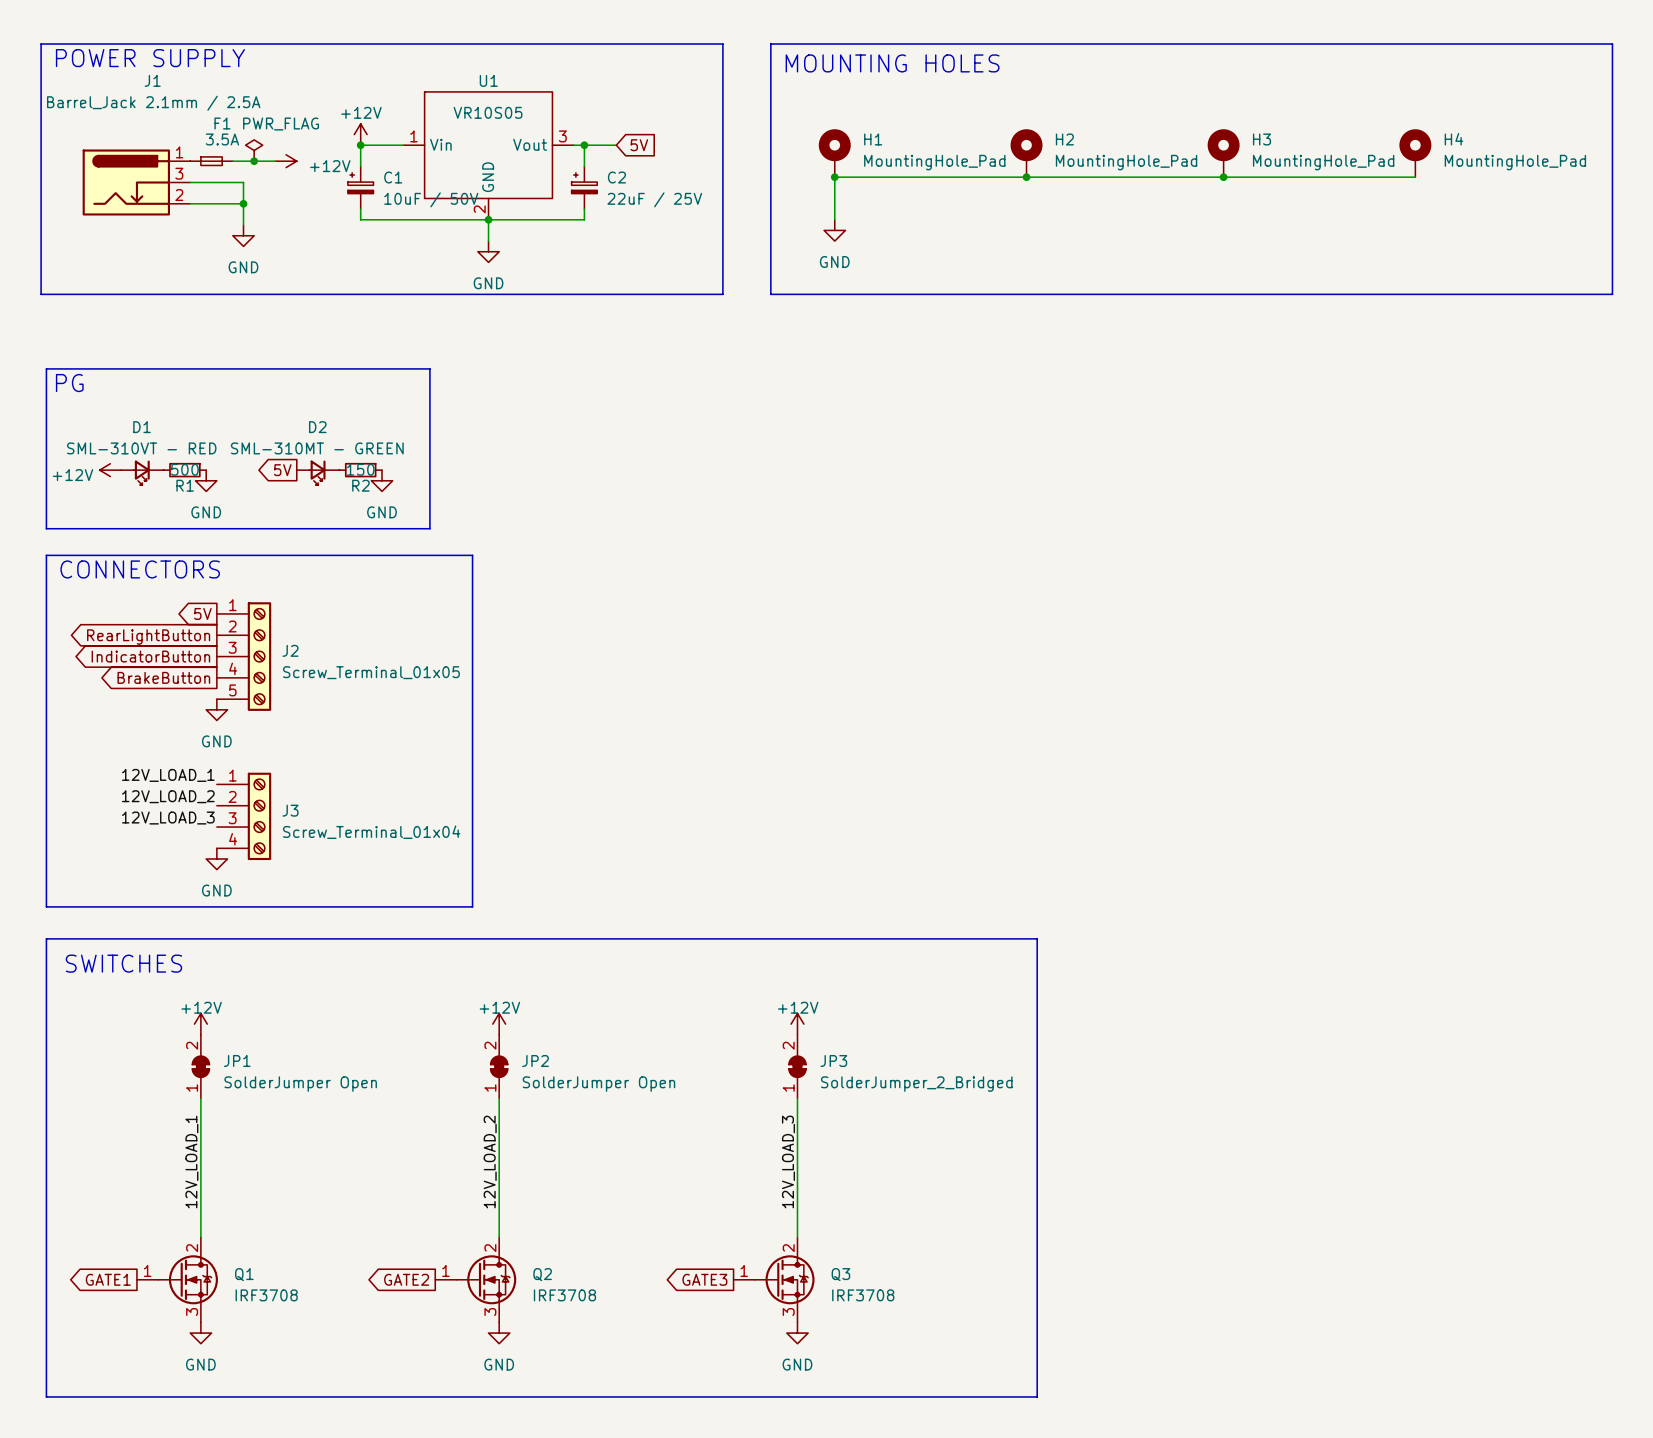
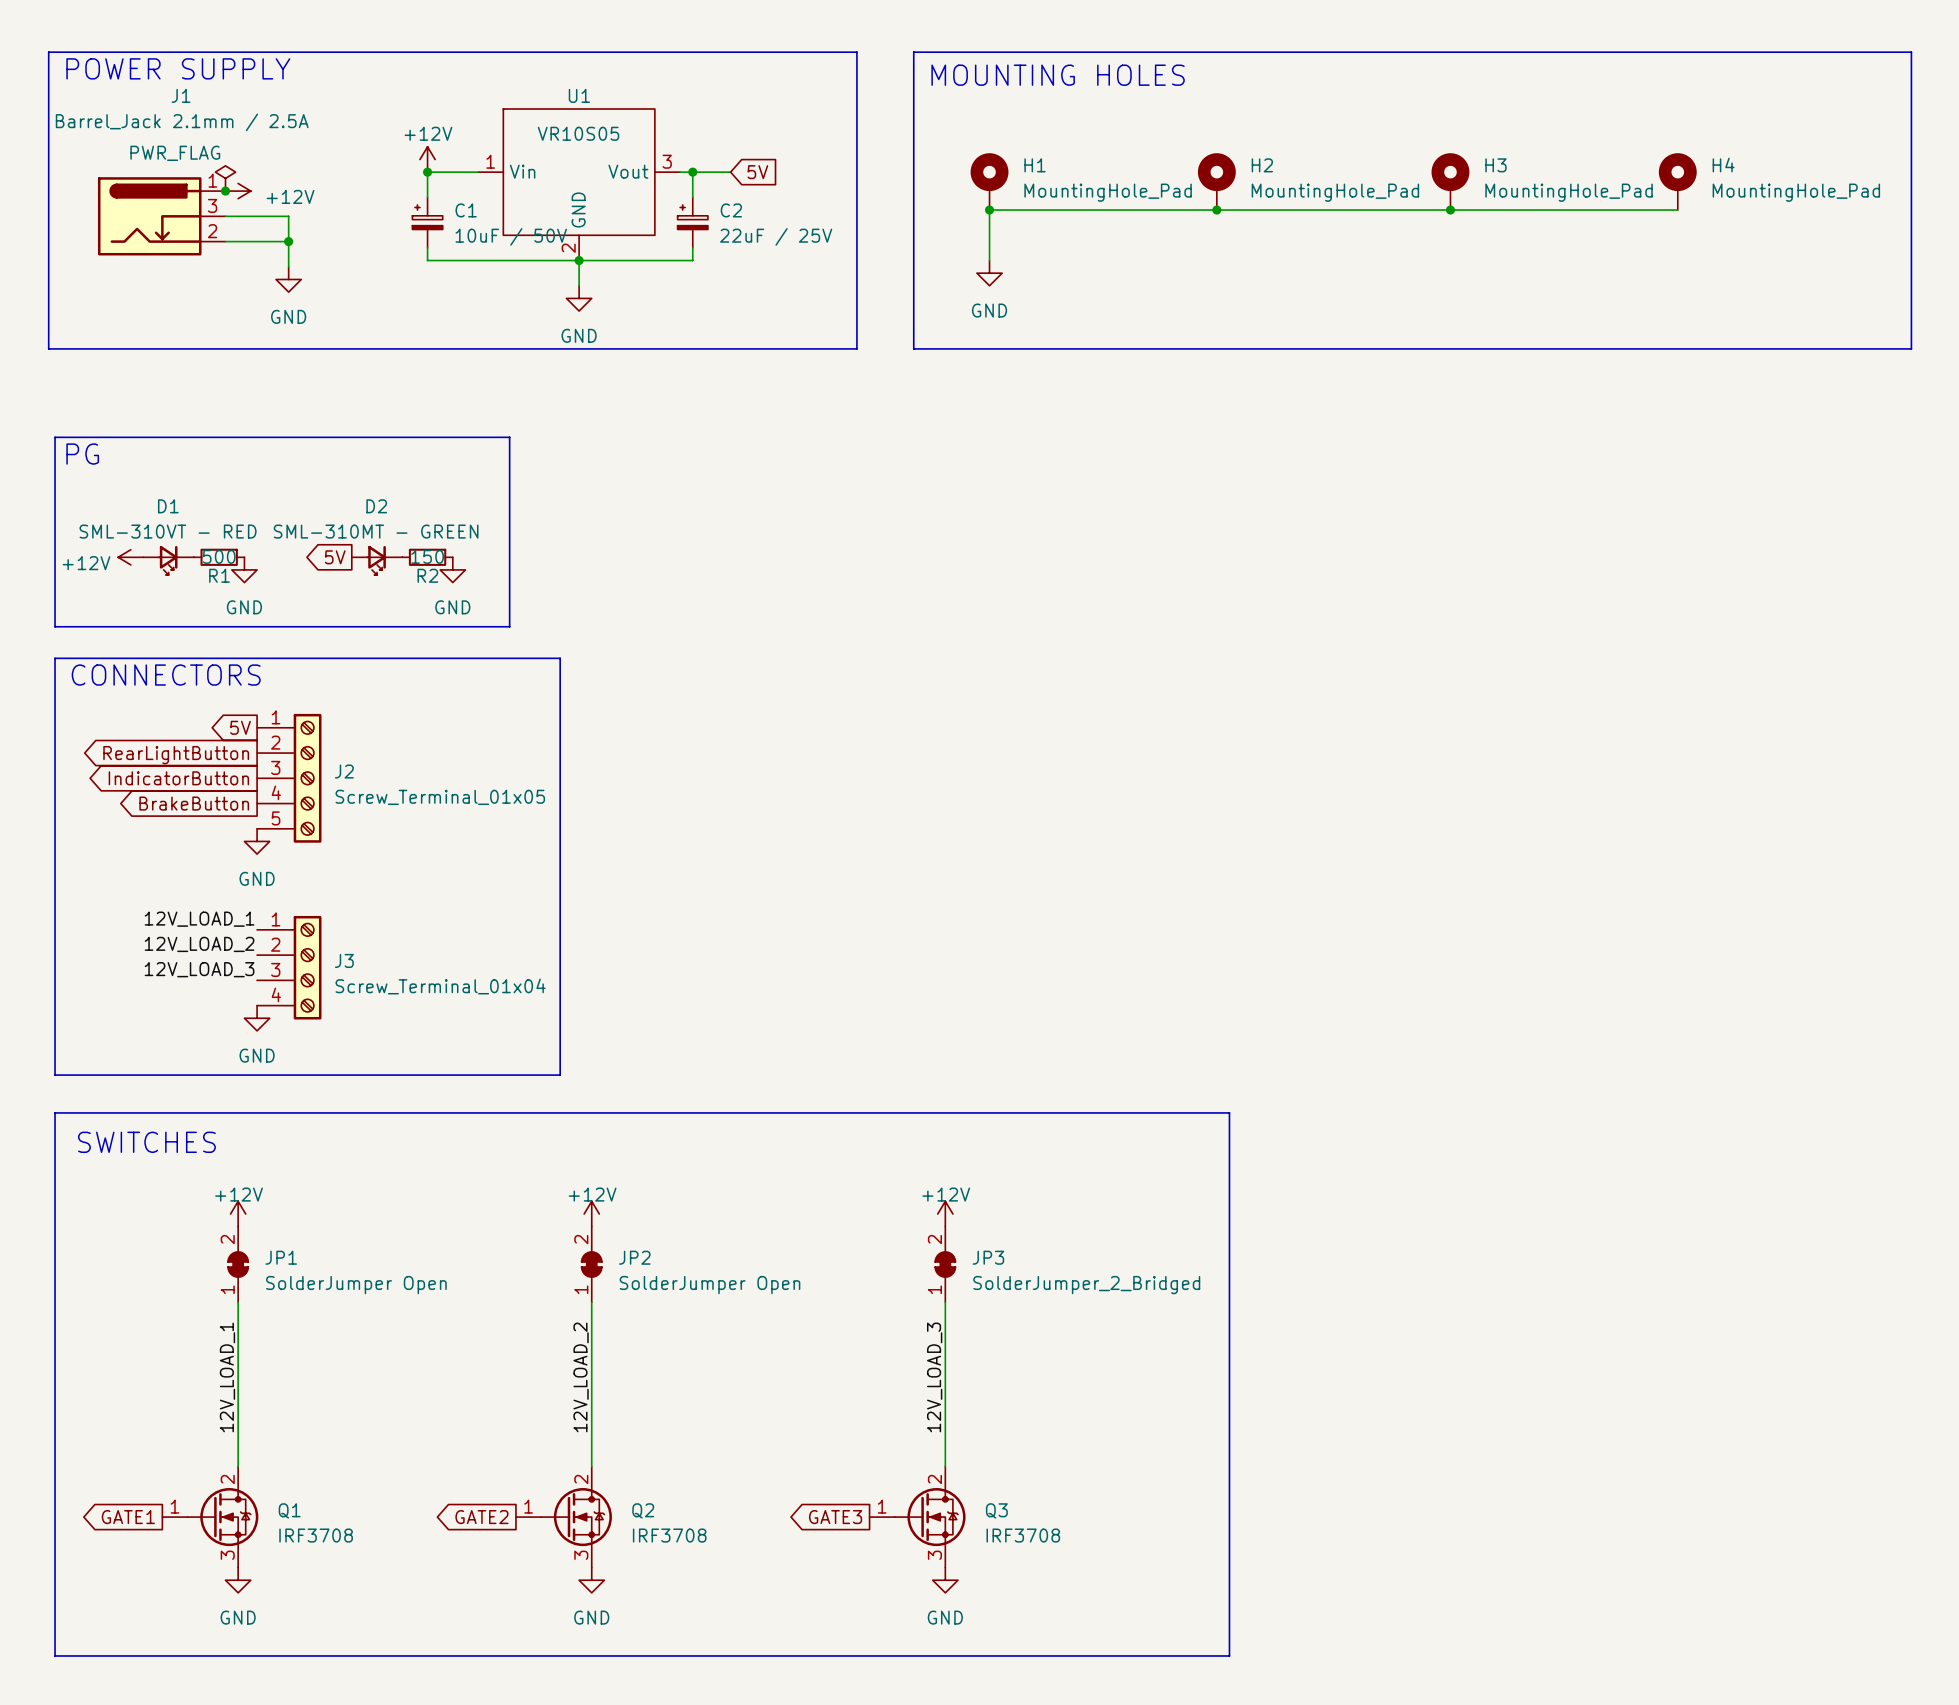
power symbol text position: PWR_FLAG (281, 124) -> PWR_FLAG (175, 153)
power symbol position: PWR_FLAG (254, 150) -> PWR_FLAG (225, 178)
junction: none -> (225, 191)
F1: 3.5A (211, 161) -> none
wire: (232, 161) (275, 161) -> none
junction: (254, 161) -> none
power symbol position: +12V (286, 161) -> +12V (238, 191)

